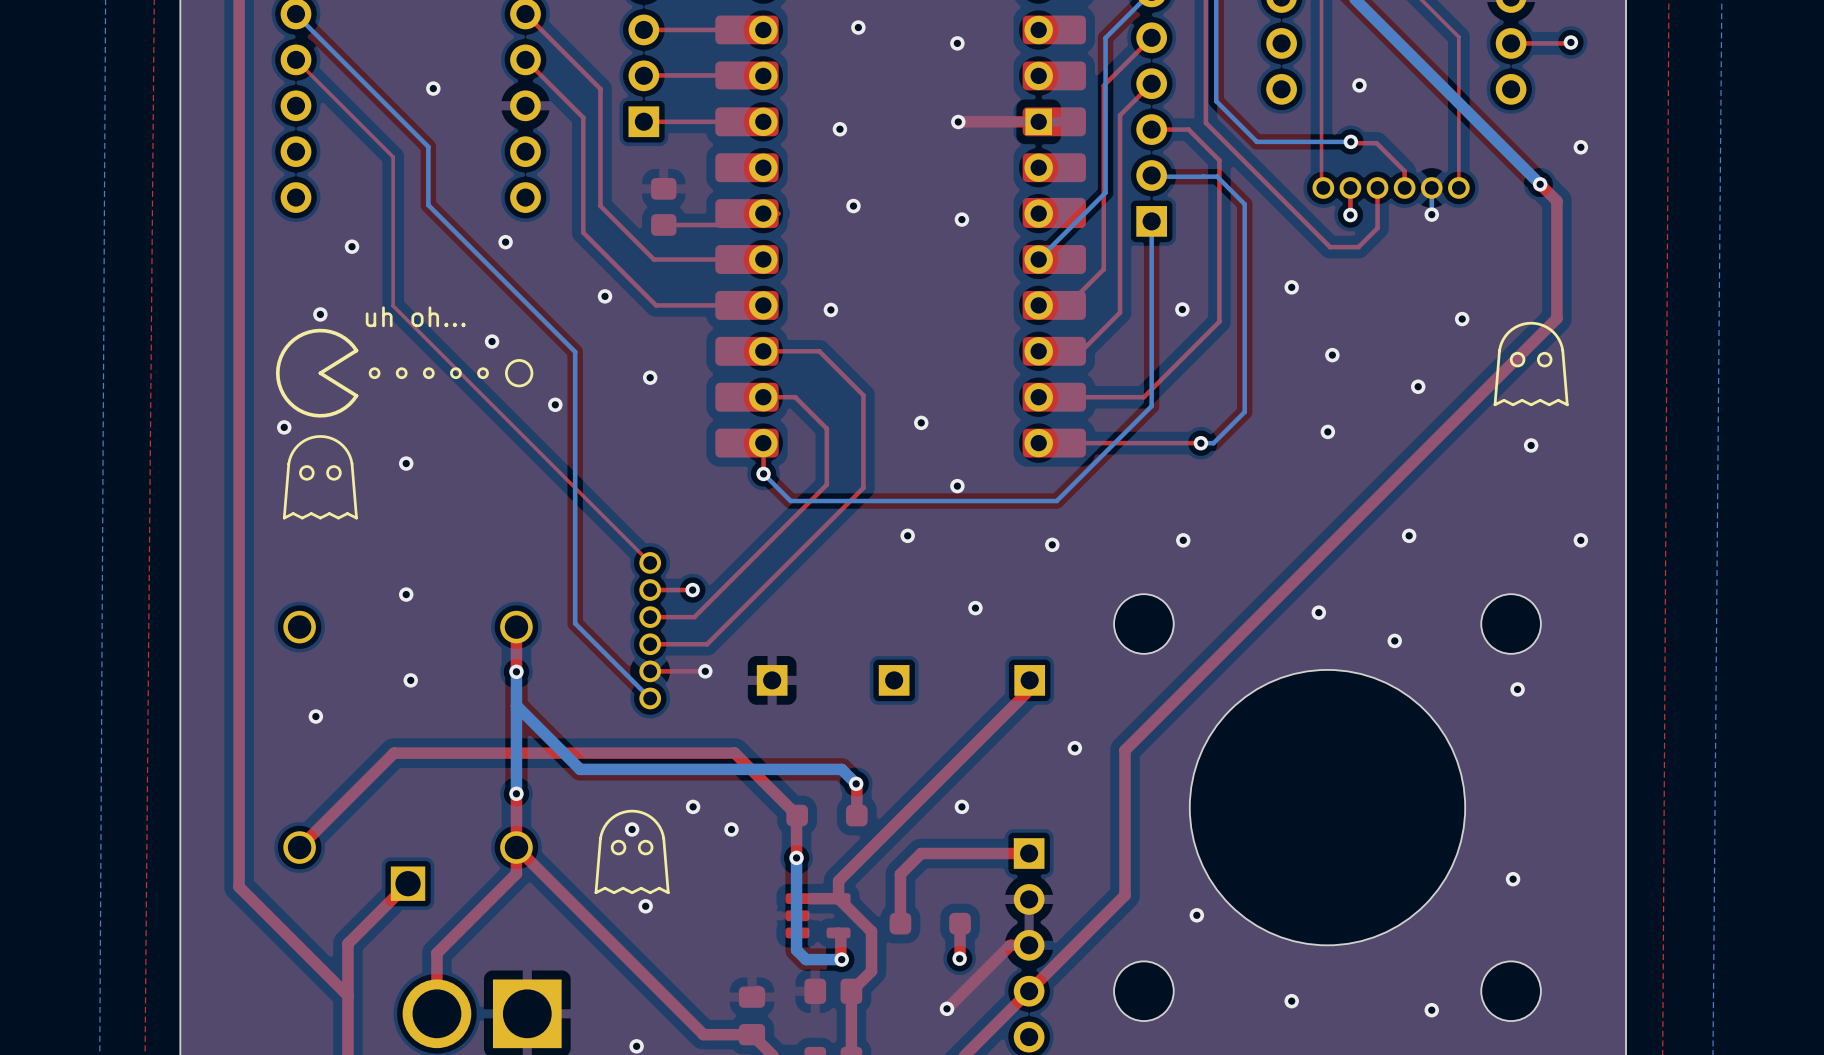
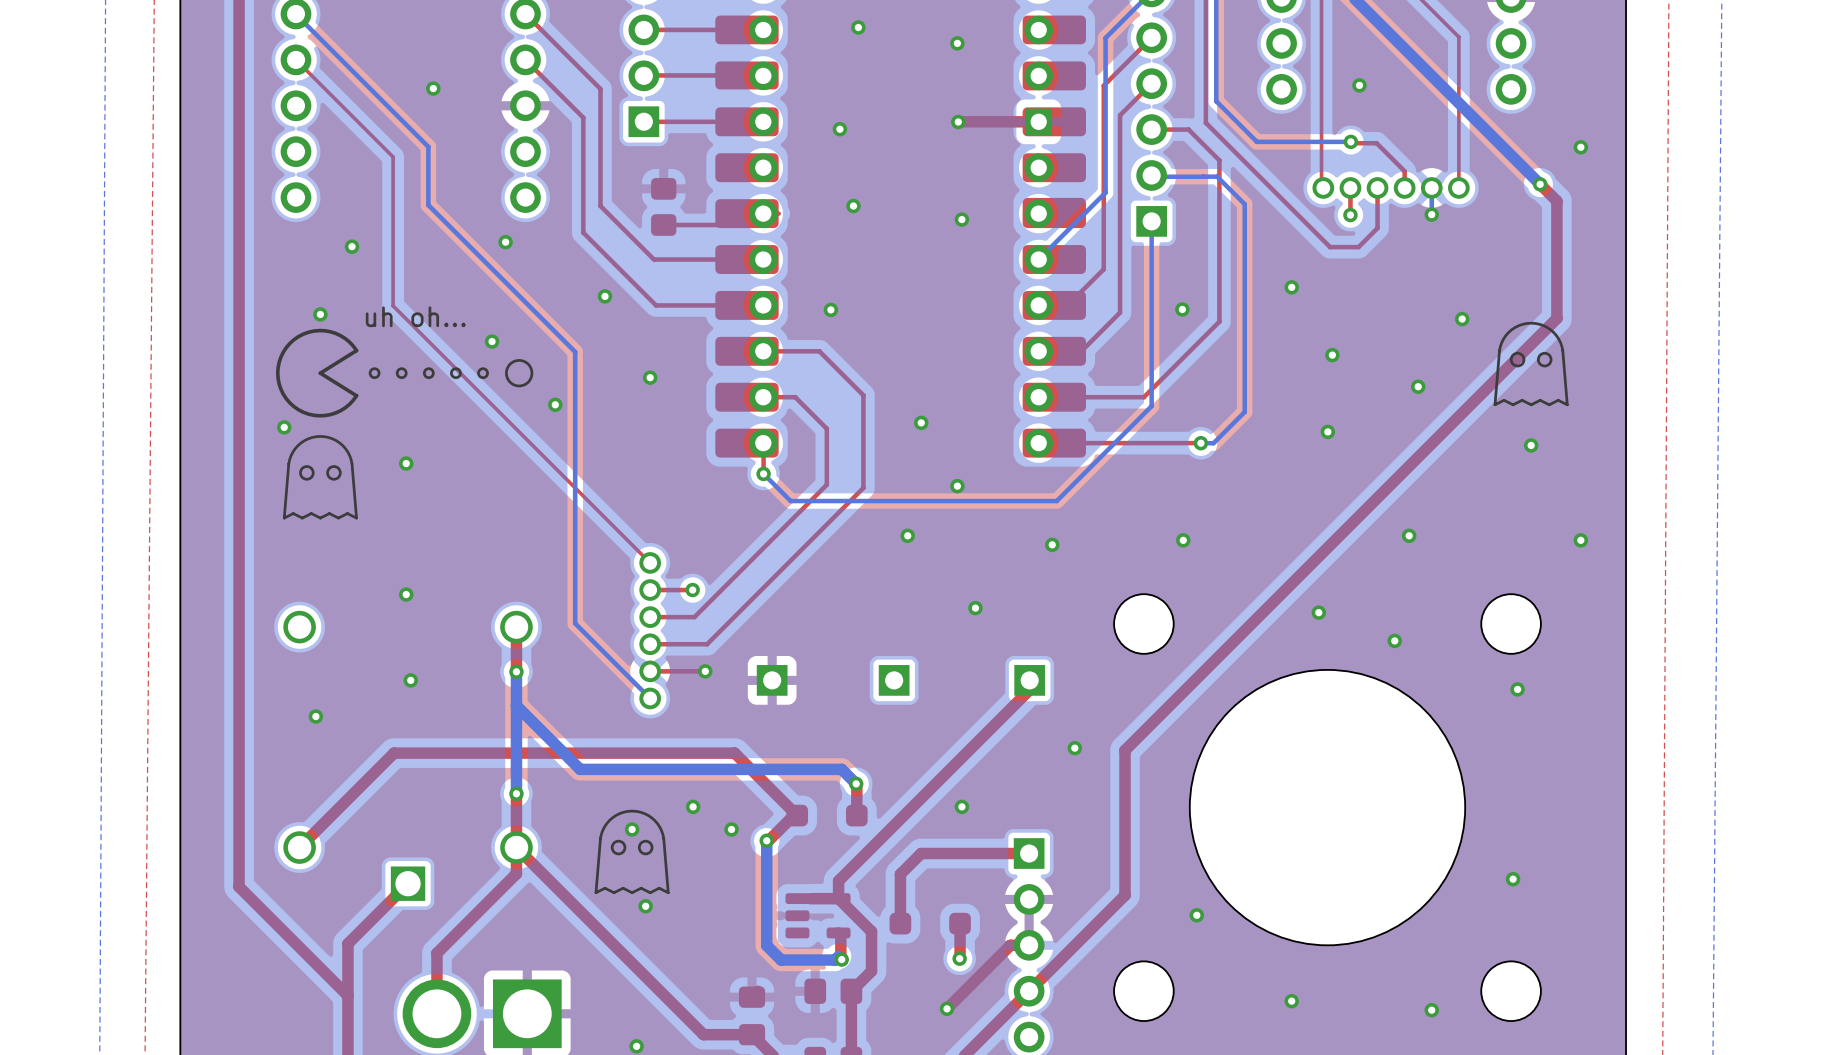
top track: (1570, 42) (1511, 43) -> none
via: (1570, 42) -> none
top track: (797, 815) (796, 857) -> (797, 815) (793, 815) (766, 840)
bottom track: none -> (766, 840) (766, 945) (781, 960) (834, 960) (838, 956)
bottom track: (796, 857) (796, 950) (806, 959) (841, 959) -> none
via position: (796, 857) -> (766, 840)

